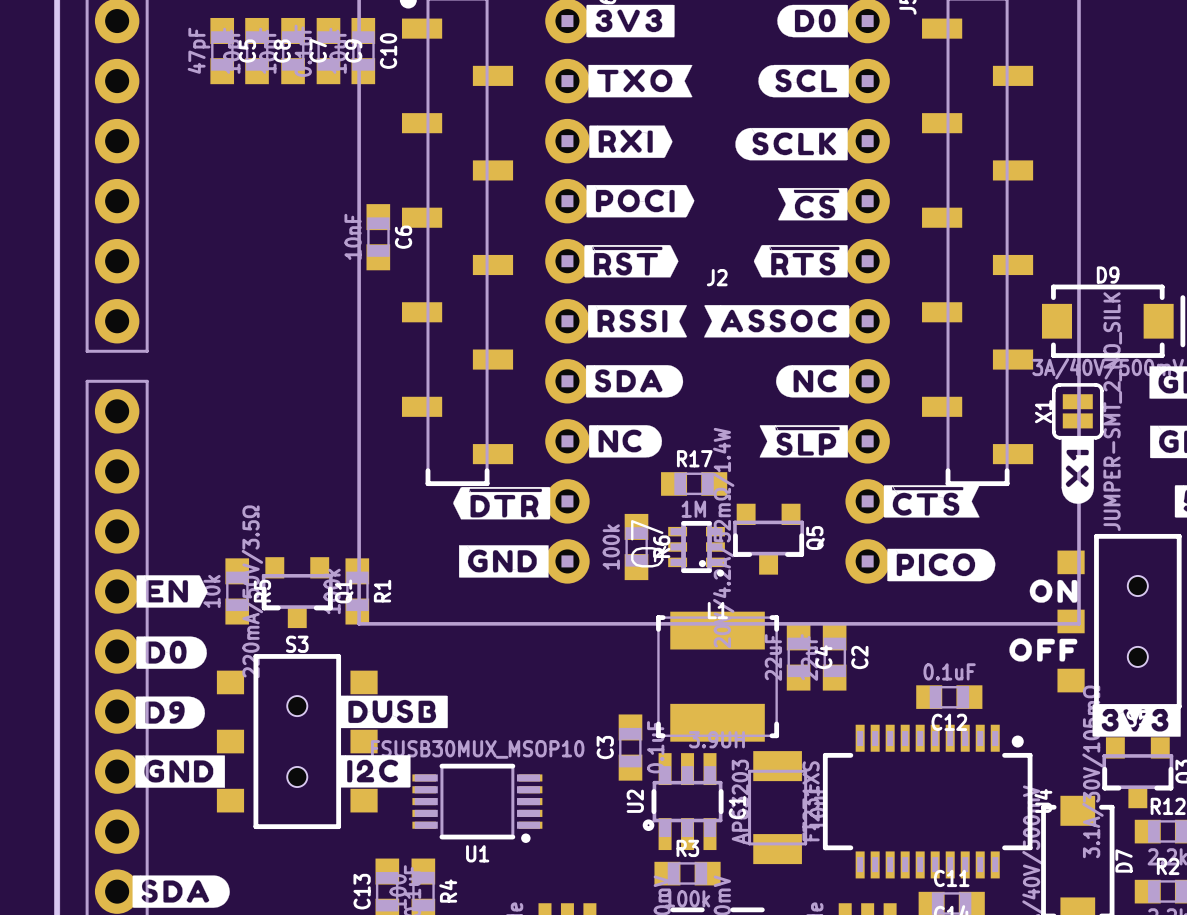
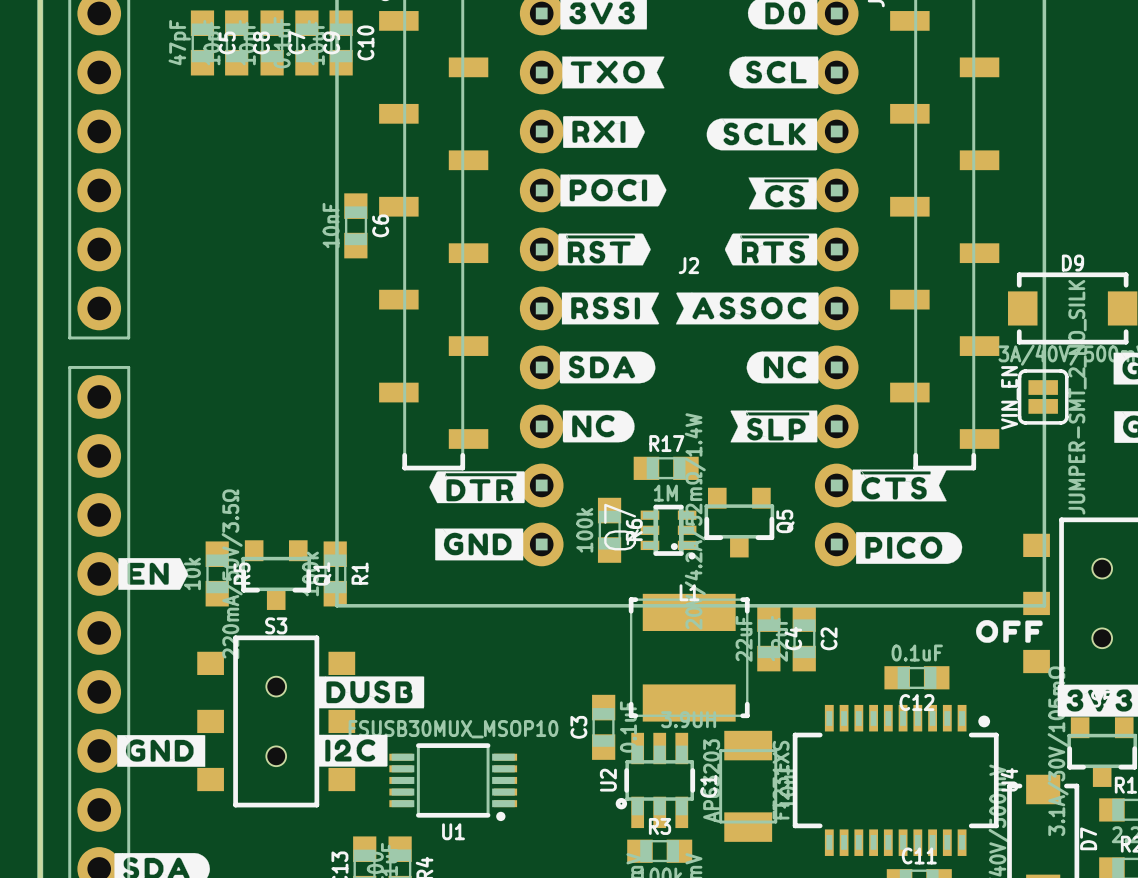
X1 name: X1 (1043, 411) -> VIN_EN (1010, 397)
drawing: [1061, 437, 1094, 504] -> none
drawing: [1029, 579, 1078, 603] -> none
drawing: [135, 636, 207, 729] -> none

